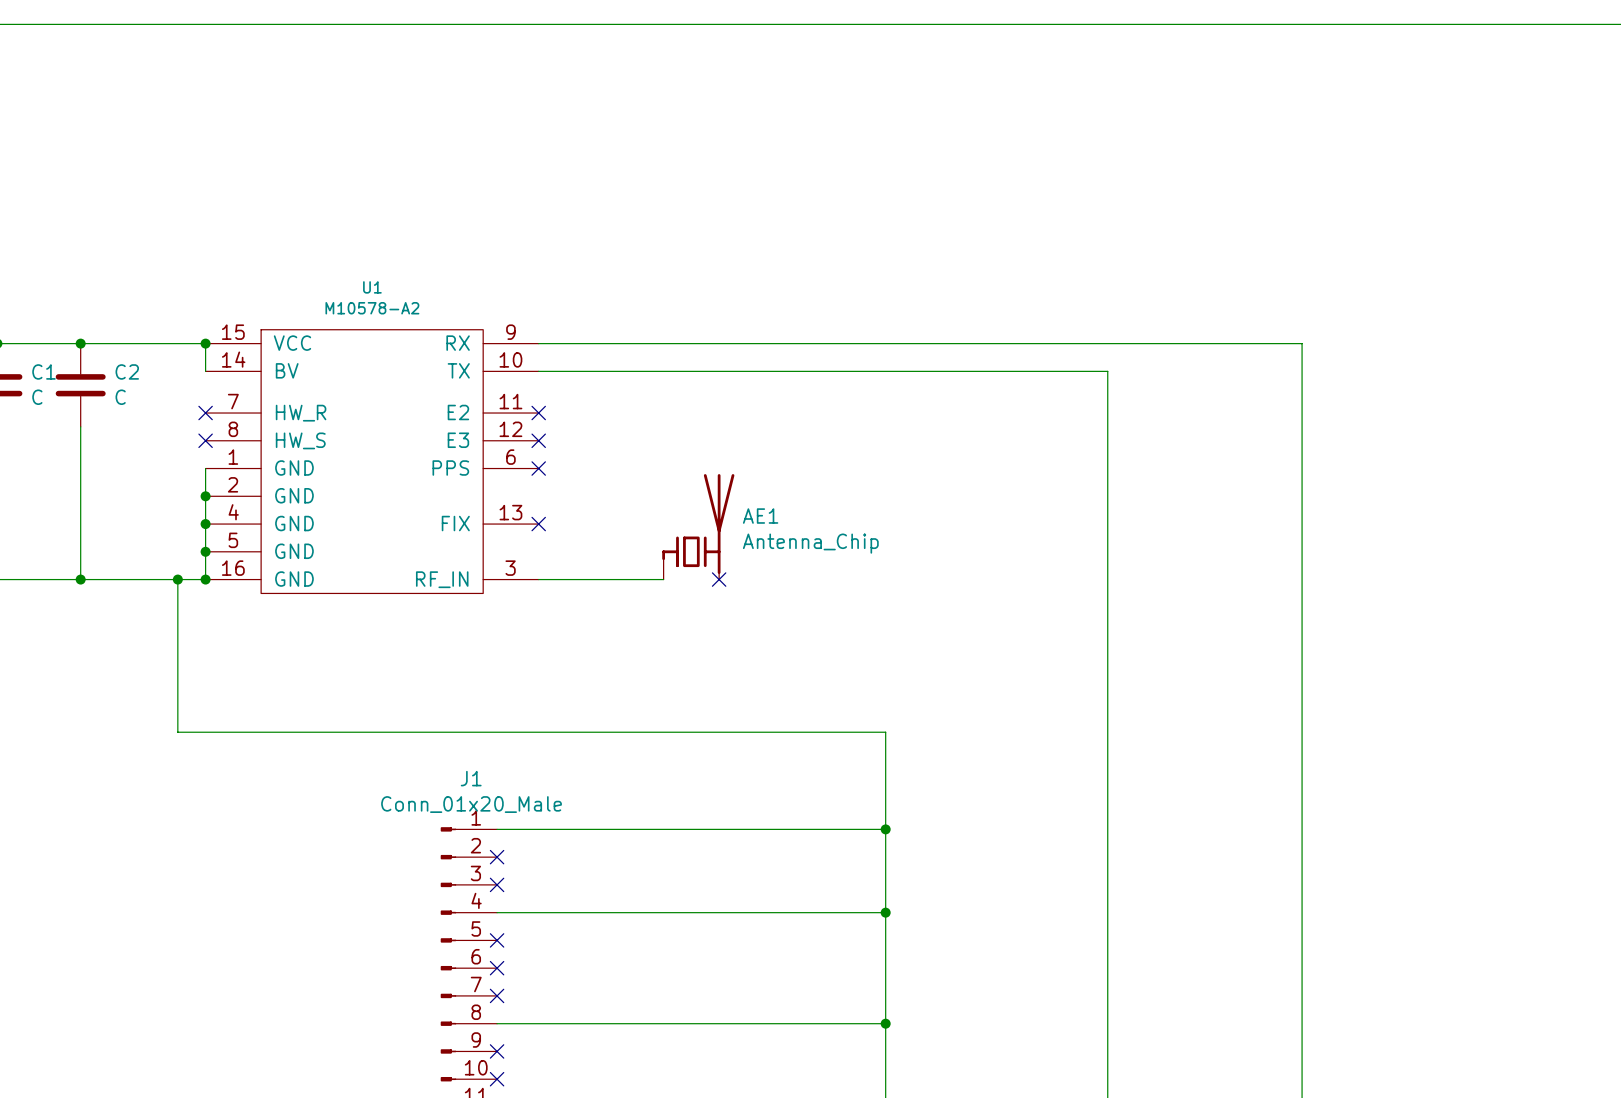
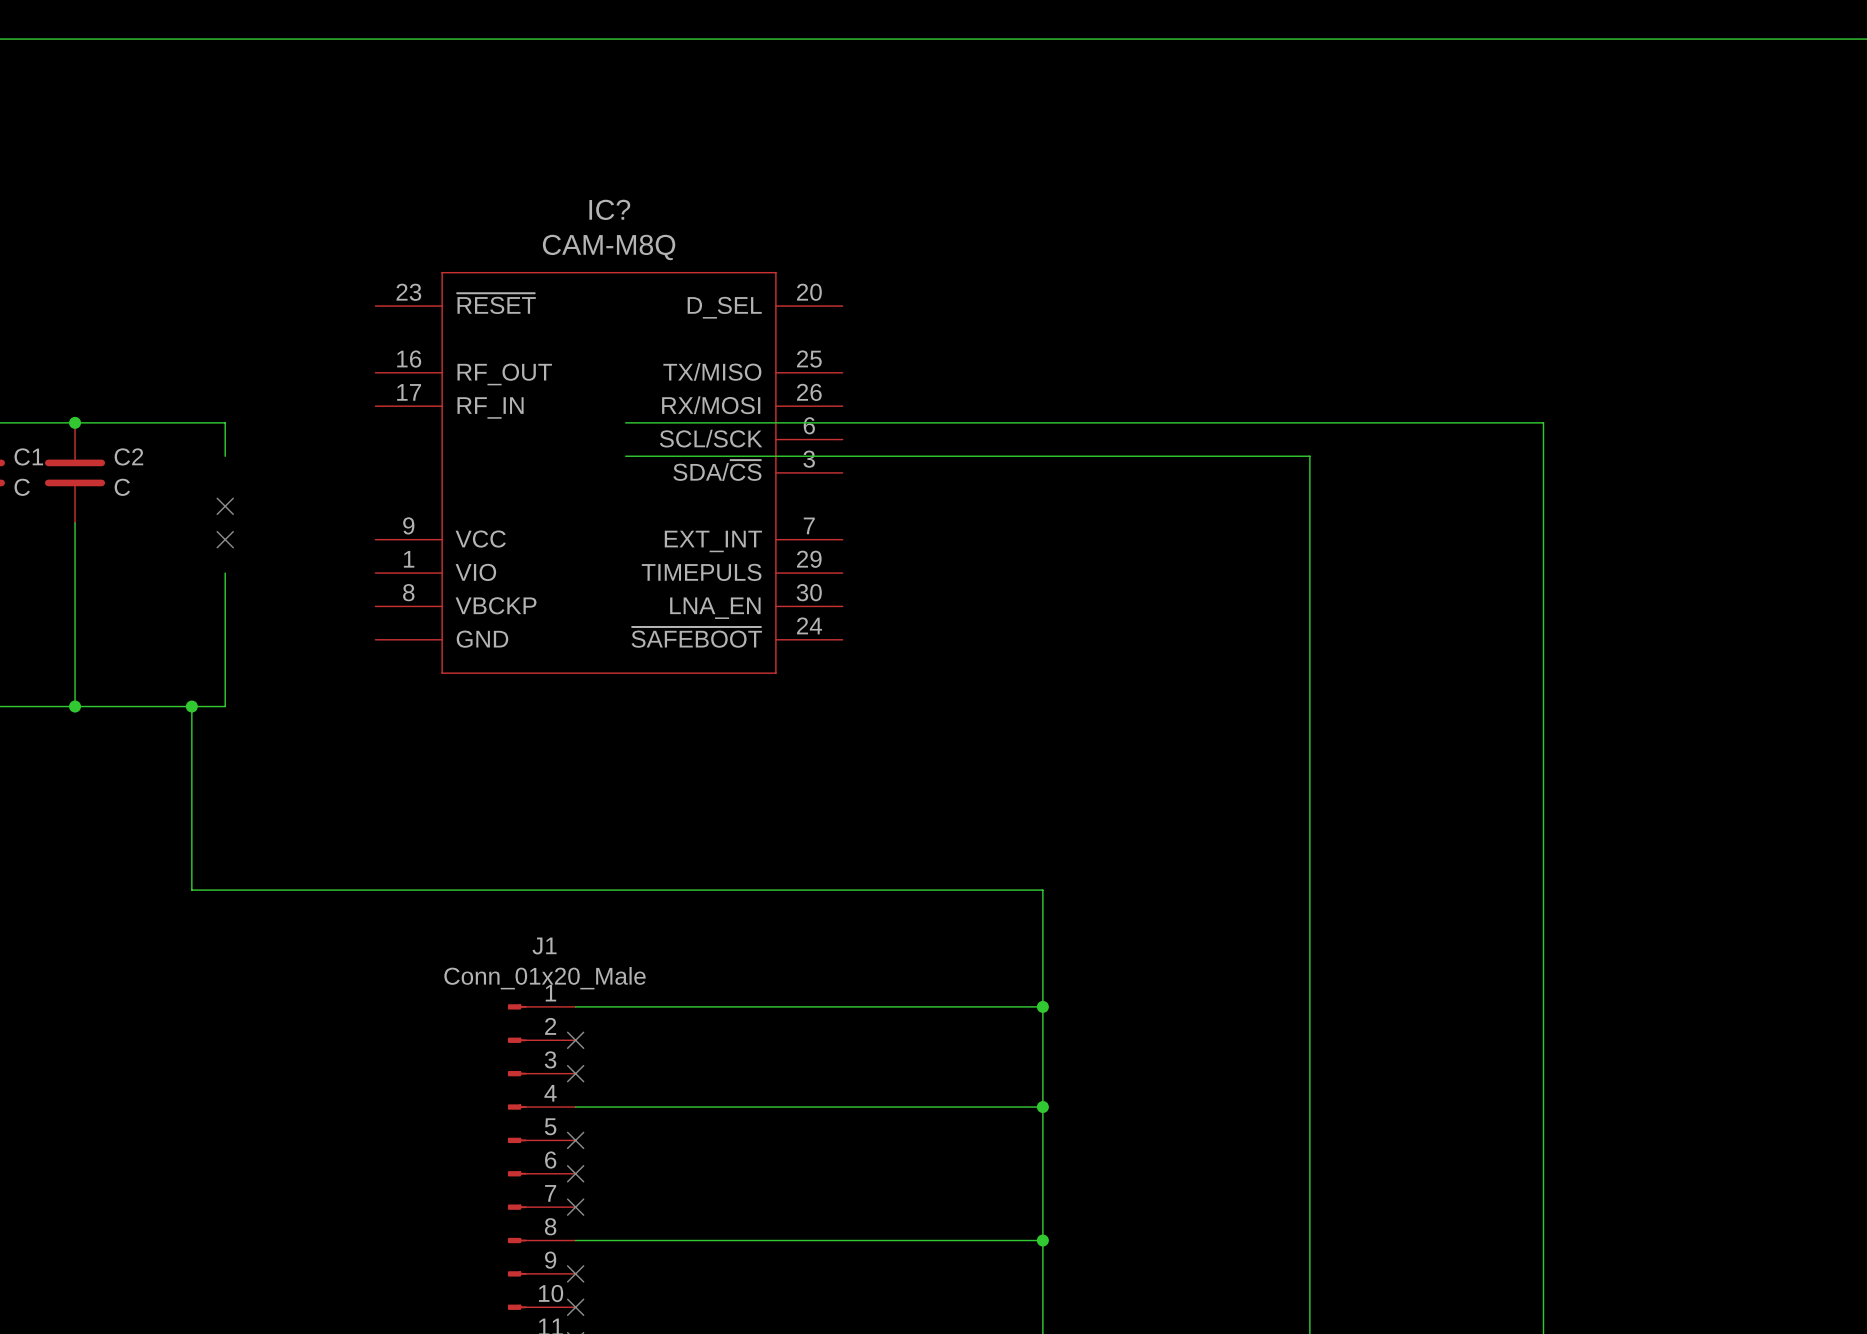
junction: (205, 343) -> none
IC?: none -> CAM-M8Q (609, 472)
no-connect mark: (538, 413) -> none
no-connect mark: (538, 440) -> none
U1: M10578-A2 (372, 461) -> none
no-connect mark: (538, 468) -> none
junction: (205, 496) -> none
junction: (205, 524) -> none
no-connect mark: (538, 524) -> none
AE1: Antenna_Chip (698, 526) -> none
junction: (205, 551) -> none
junction: (205, 579) -> none
wire: (538, 579) (663, 579) -> none
no-connect mark: (719, 579) -> none

